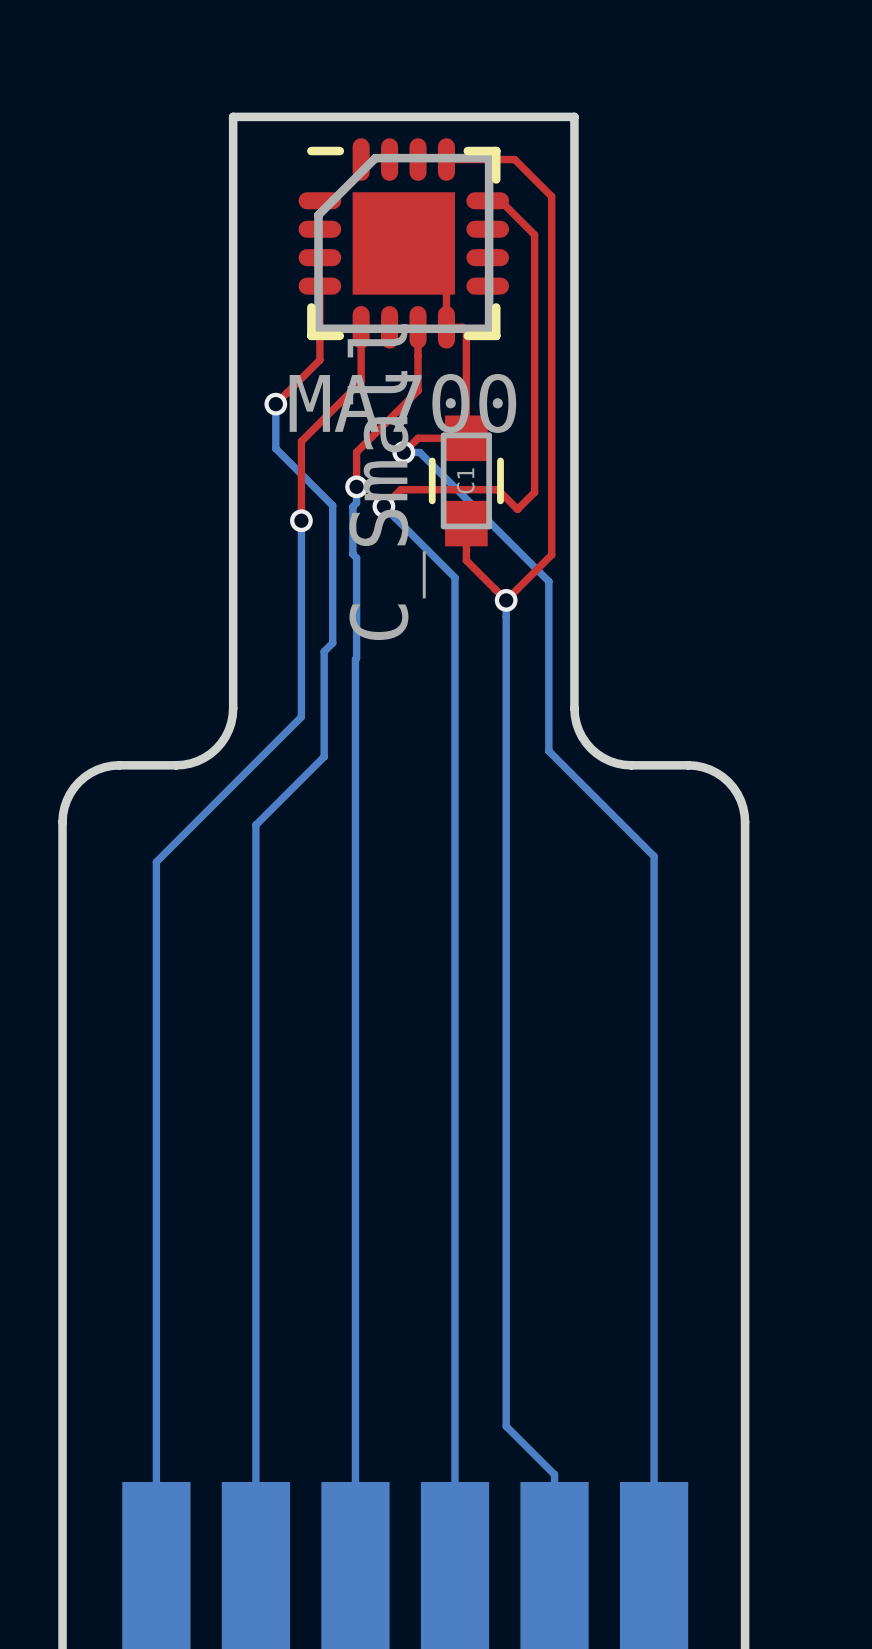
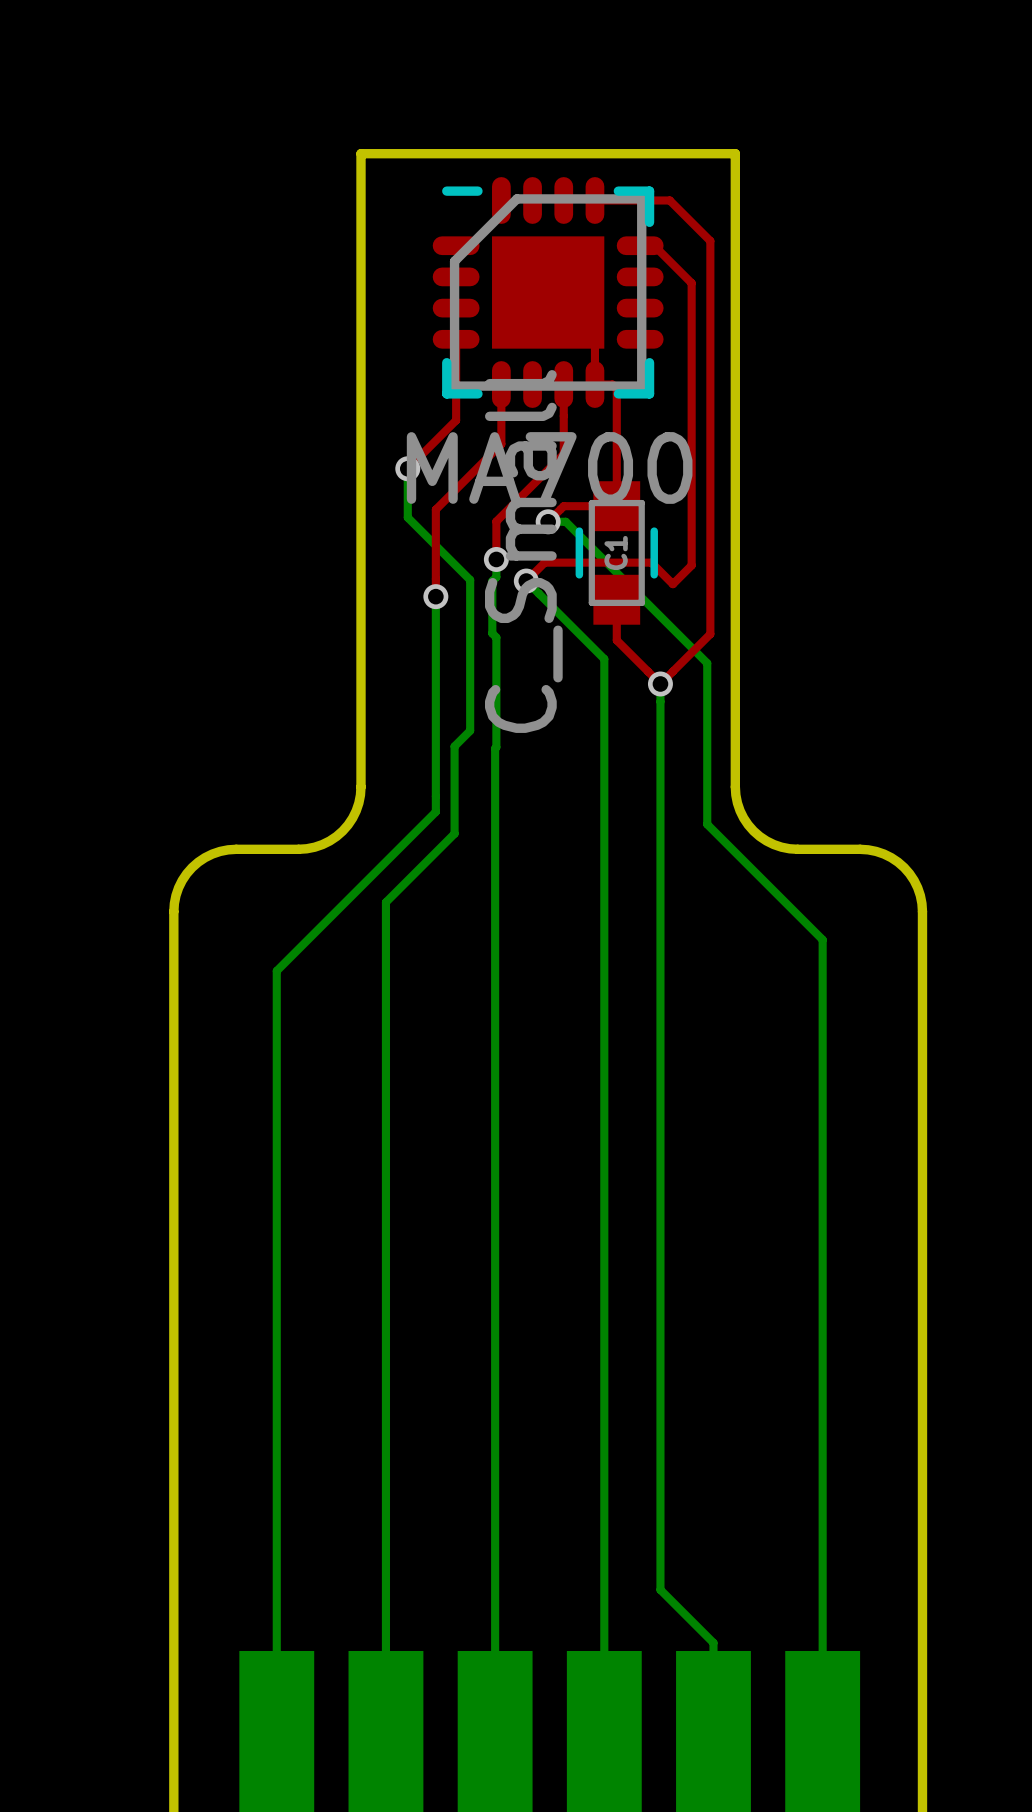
bottom track: (324, 651) (324, 756) (255, 825) -> (460, 740) (454, 746) (454, 833) (385, 902) (385, 930)
board edge: (233, 694) (232, 715) (228, 730) (221, 743) (210, 753) (198, 760) (183, 764) (119, 765) (97, 769) (84, 777) (74, 787) (66, 800) (62, 822) -> (360, 786) (356, 810) (348, 824) (336, 836) (322, 844) (298, 849) (228, 849) (212, 854) (198, 862) (186, 873) (178, 887) (174, 903) (173, 927)
board edge: (574, 694) (574, 715) (578, 730) (586, 743) (596, 753) (609, 760) (623, 764) (688, 765) (709, 769) (722, 777) (733, 787) (740, 800) (745, 822) -> (735, 786) (740, 810) (748, 824) (759, 836) (773, 844) (797, 849) (868, 849) (883, 854) (898, 862) (909, 873) (917, 887) (921, 903) (922, 927)
bottom track: (548, 728) (548, 751) (654, 856) -> (707, 824) (822, 939) (822, 964)

